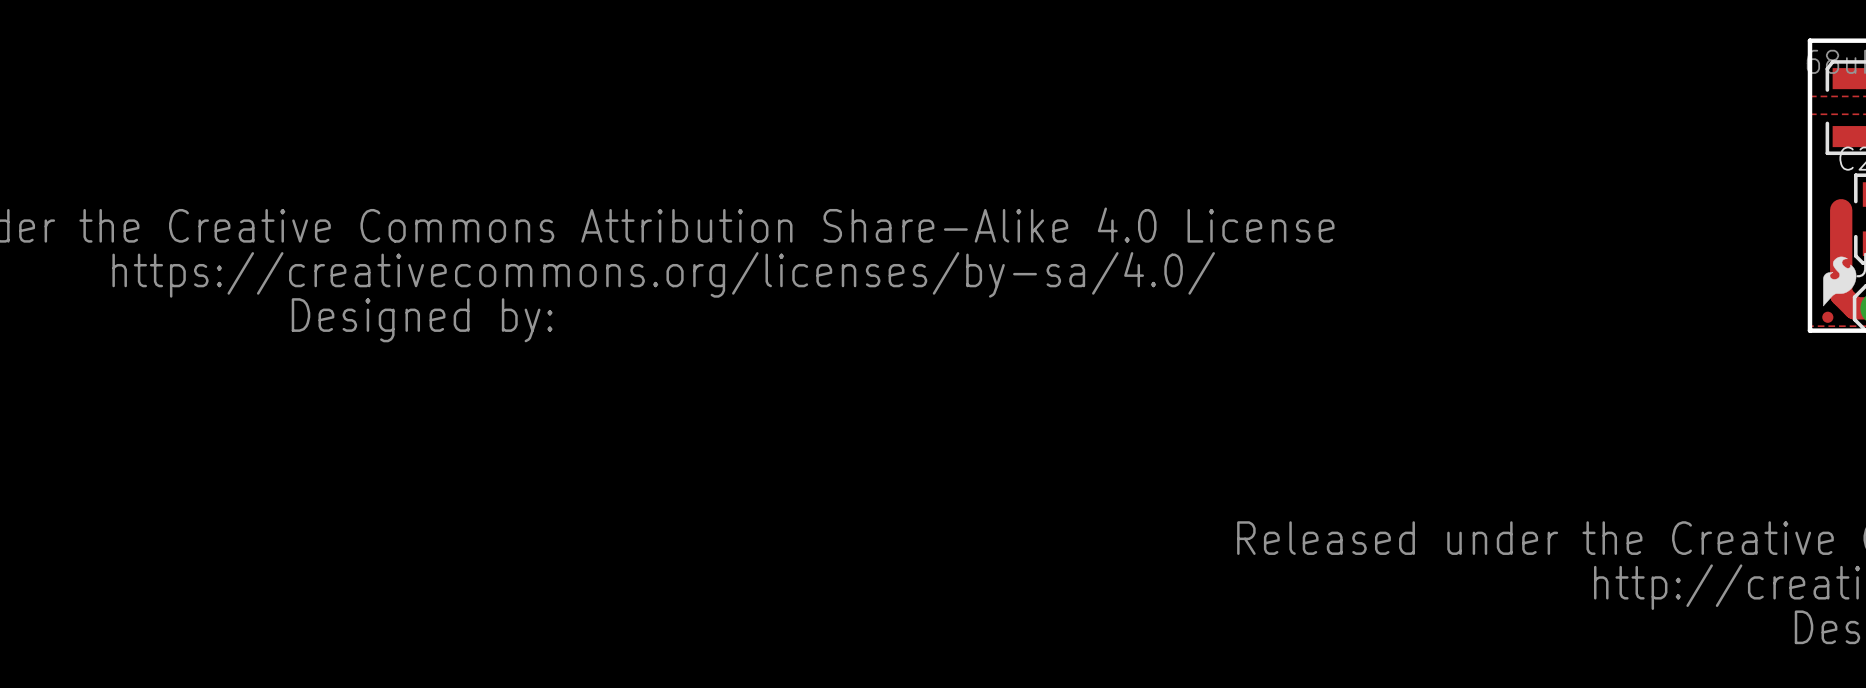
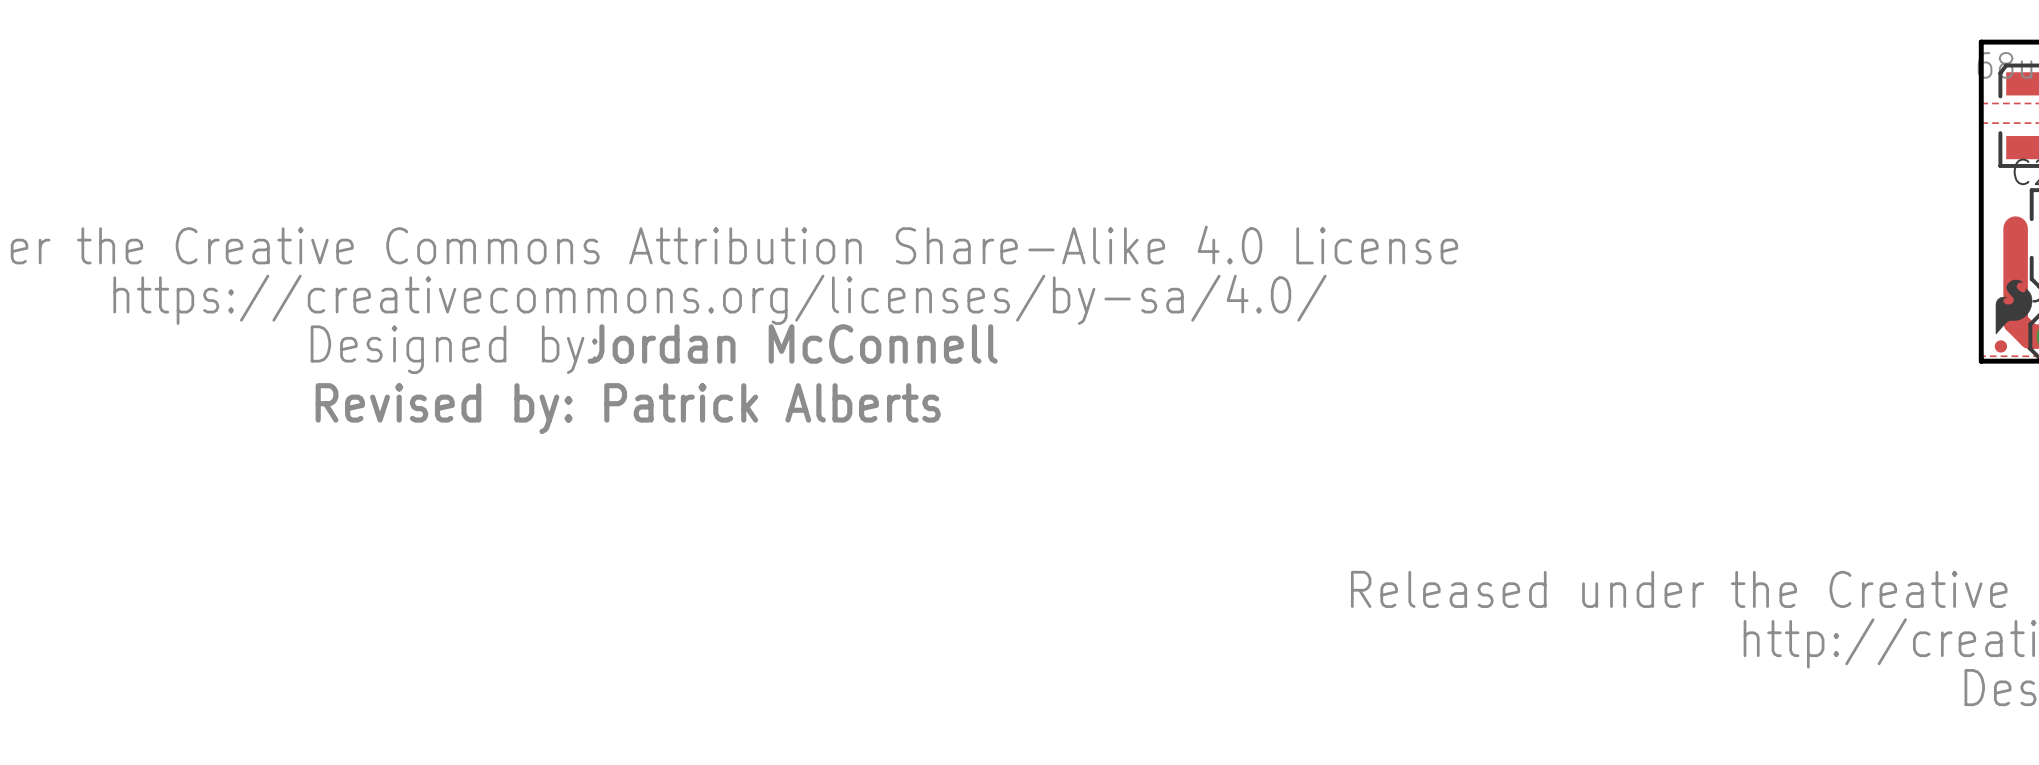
text: none -> Jordan McConnell (792, 343)
text: none -> Revised by: Patrick Alberts (628, 408)

